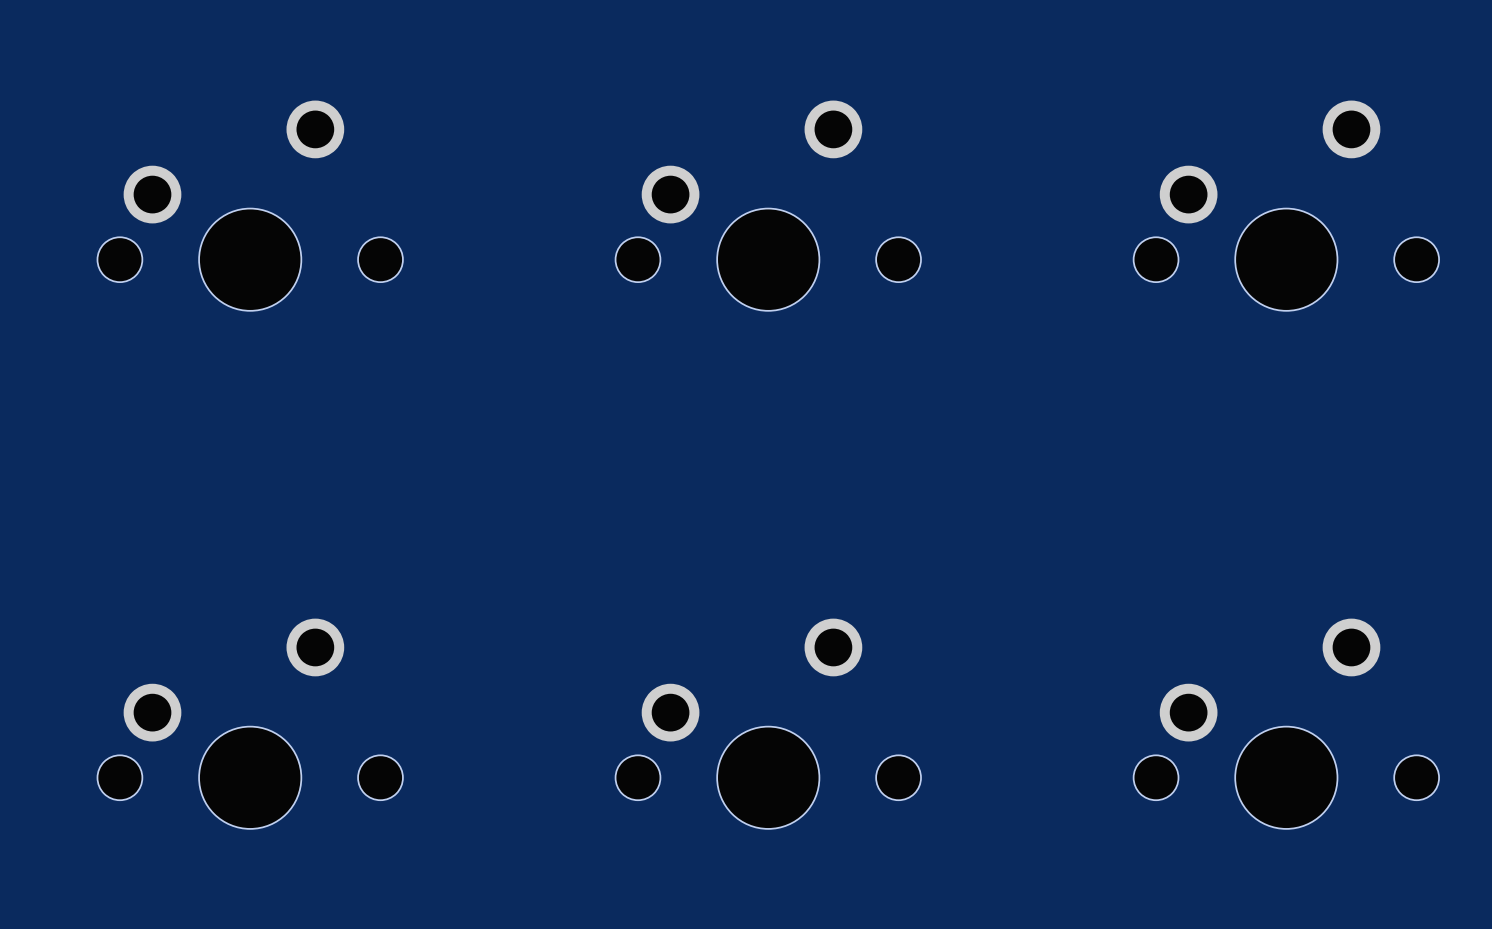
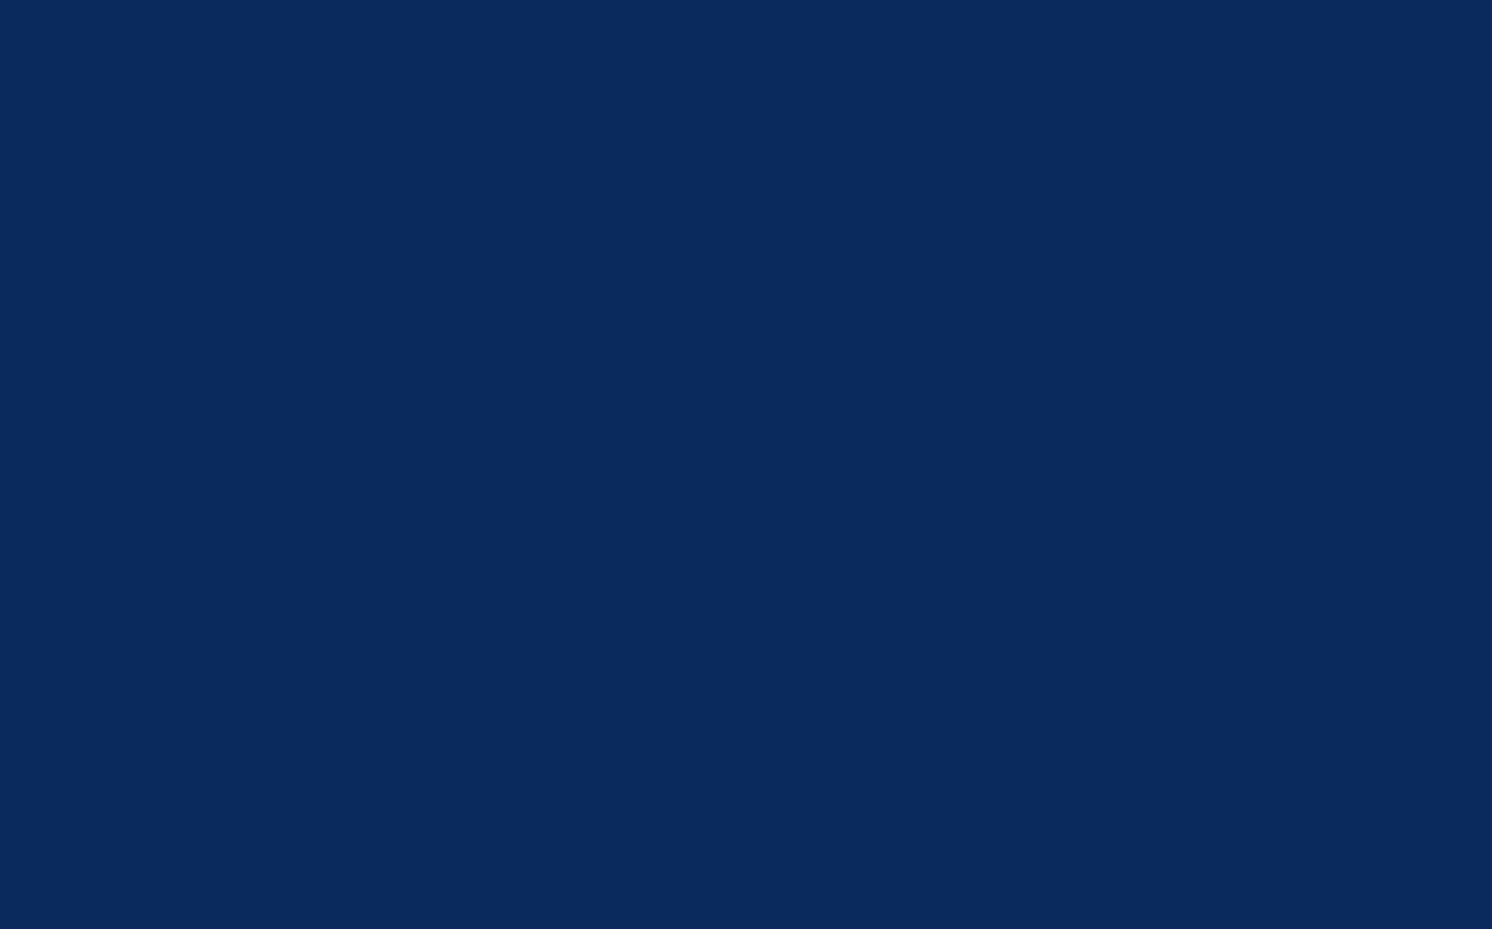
part: (250, 205) -> none
part: (768, 205) -> none
part: (1286, 205) -> none
part: (250, 723) -> none
part: (768, 723) -> none
part: (1286, 723) -> none

